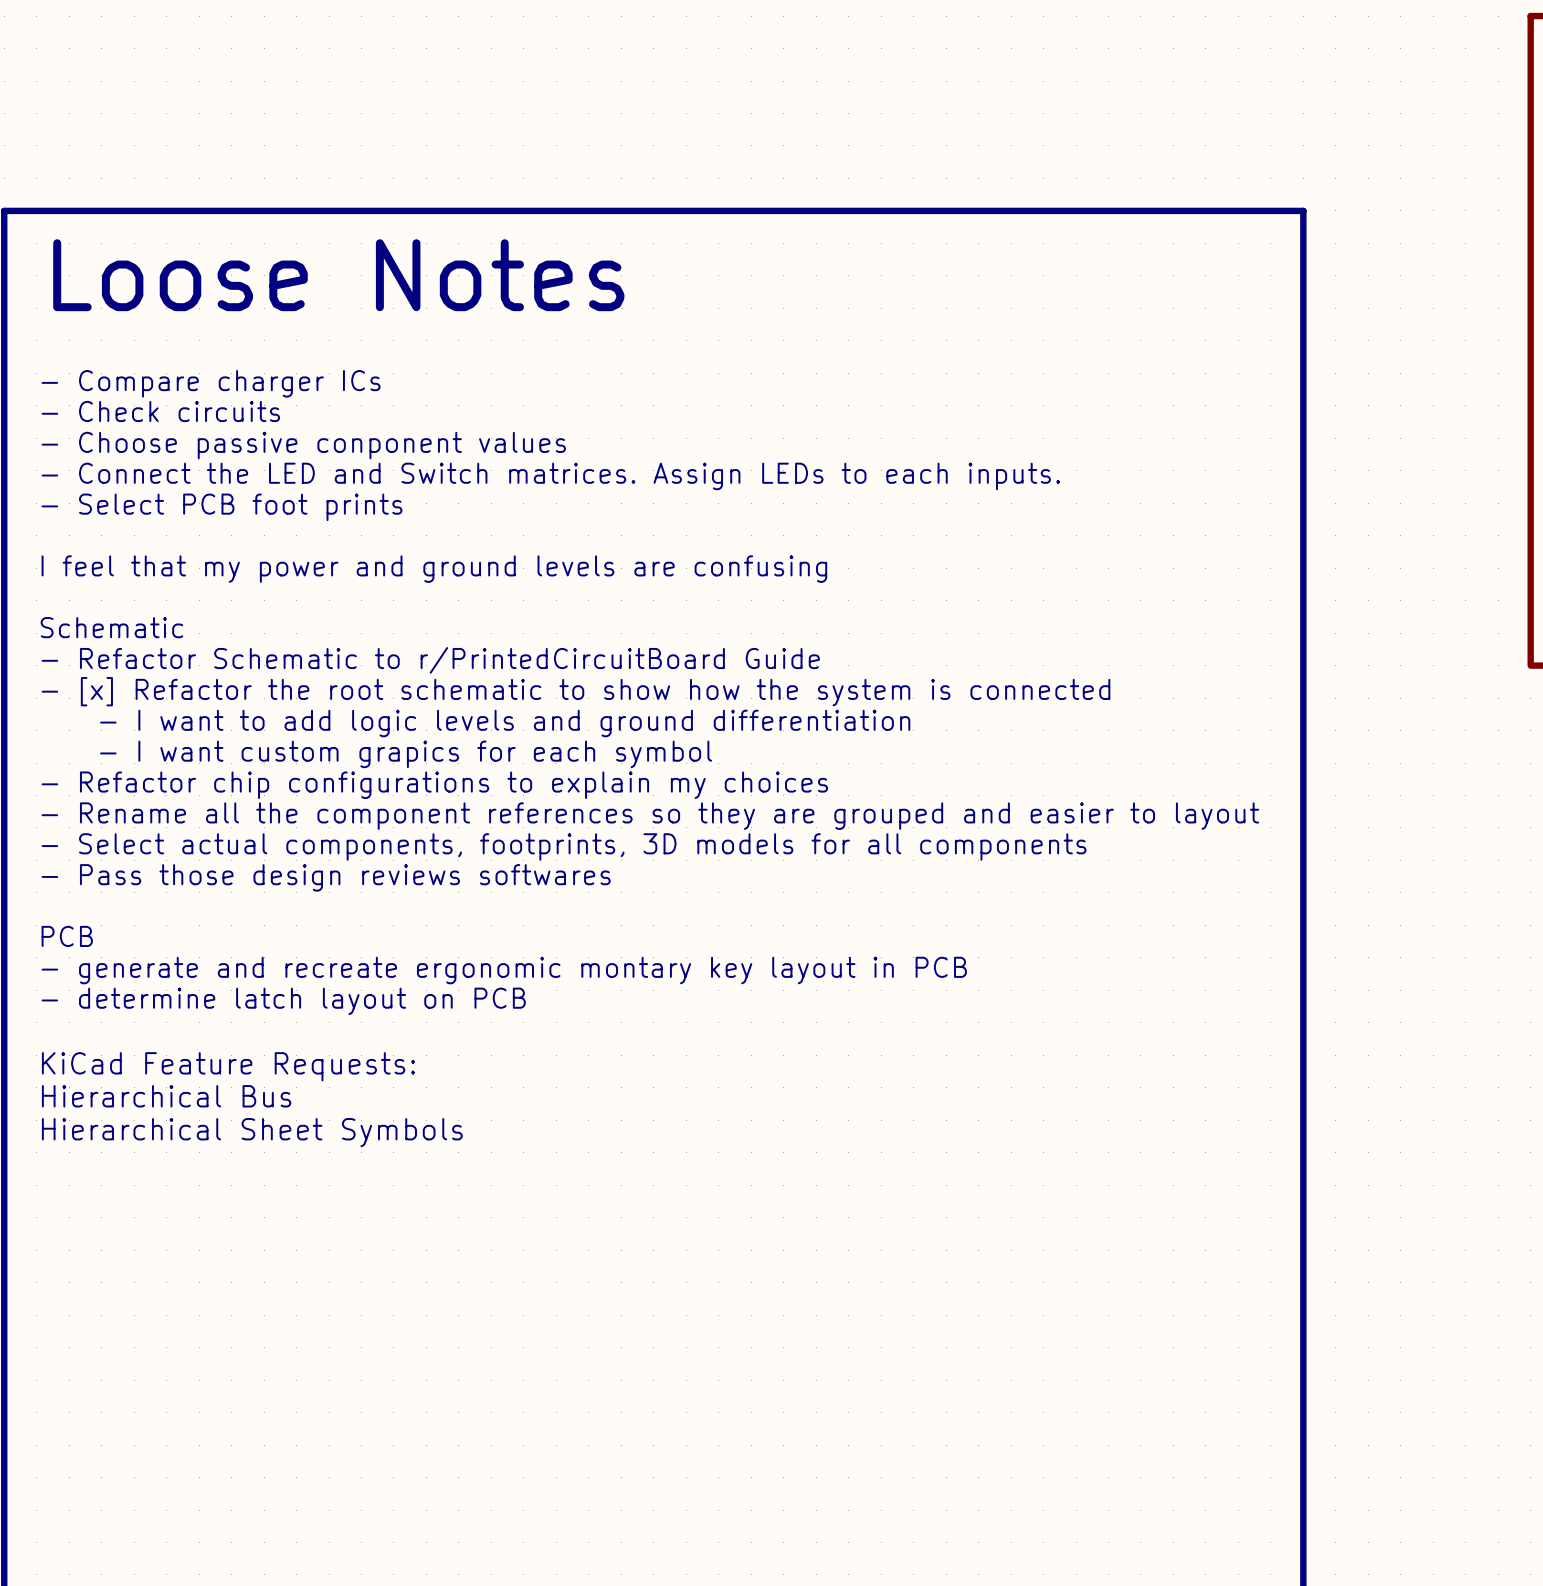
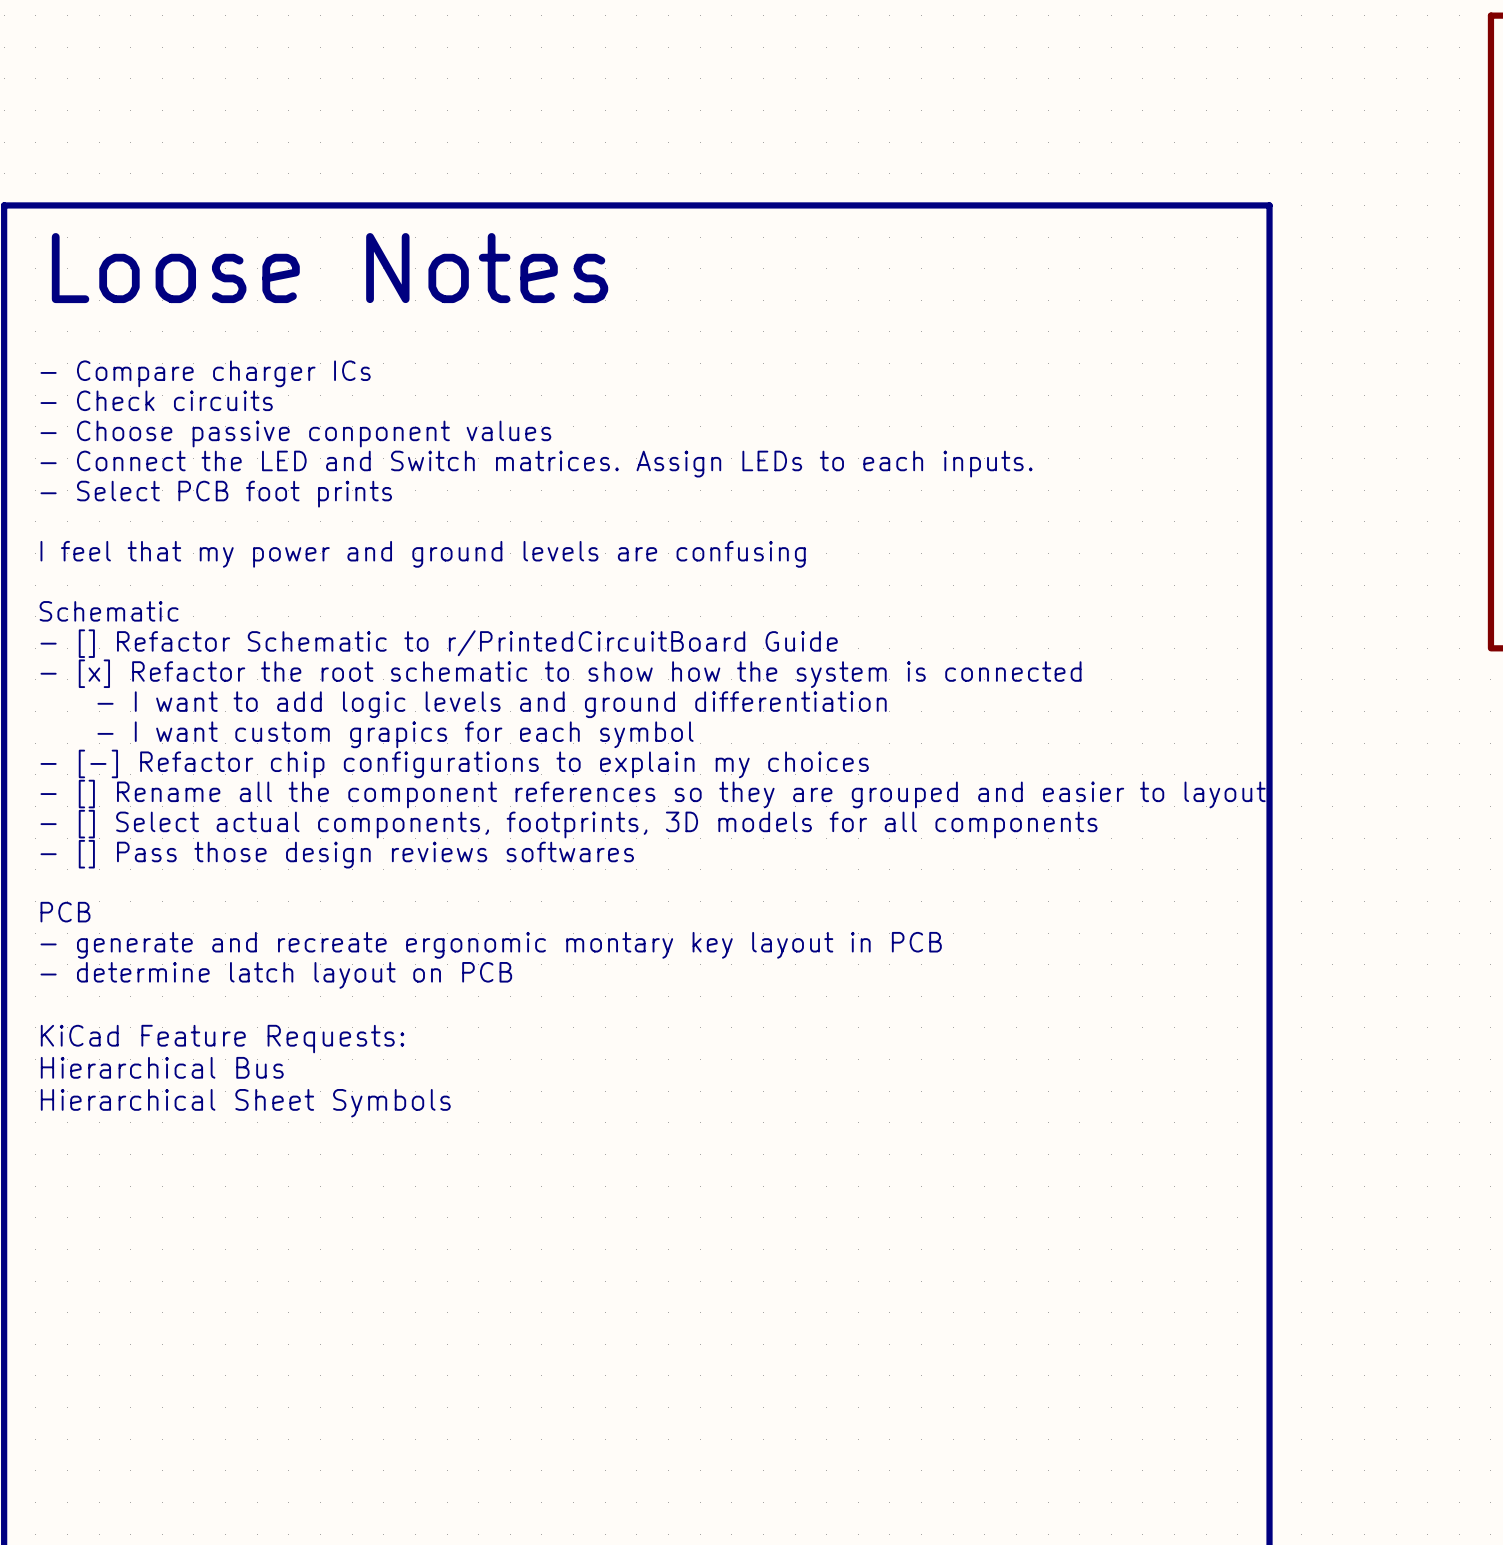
text: - Refactor Schematic to r/PrintedCircuitBoard Guide (430, 660) -> - [] Refactor Schematic to r/PrintedCircuitBoard Guide (439, 643)
text: - Refactor chip configurations to explain my choices (434, 785) -> - [-] Refactor chip configurations to explain my choices (454, 763)
text: - Rename all the component references so they are grouped and easier to layout (650, 816) -> - [] Rename all the component references so they are grouped and easier to layout (653, 794)
text: - Select actual components, footprints, 3D models for all components (564, 846) -> - [] Select actual components, footprints, 3D models for all components (569, 824)
text: - Pass those design reviews softwares (326, 877) -> - [] Pass those design reviews softwares (337, 854)

